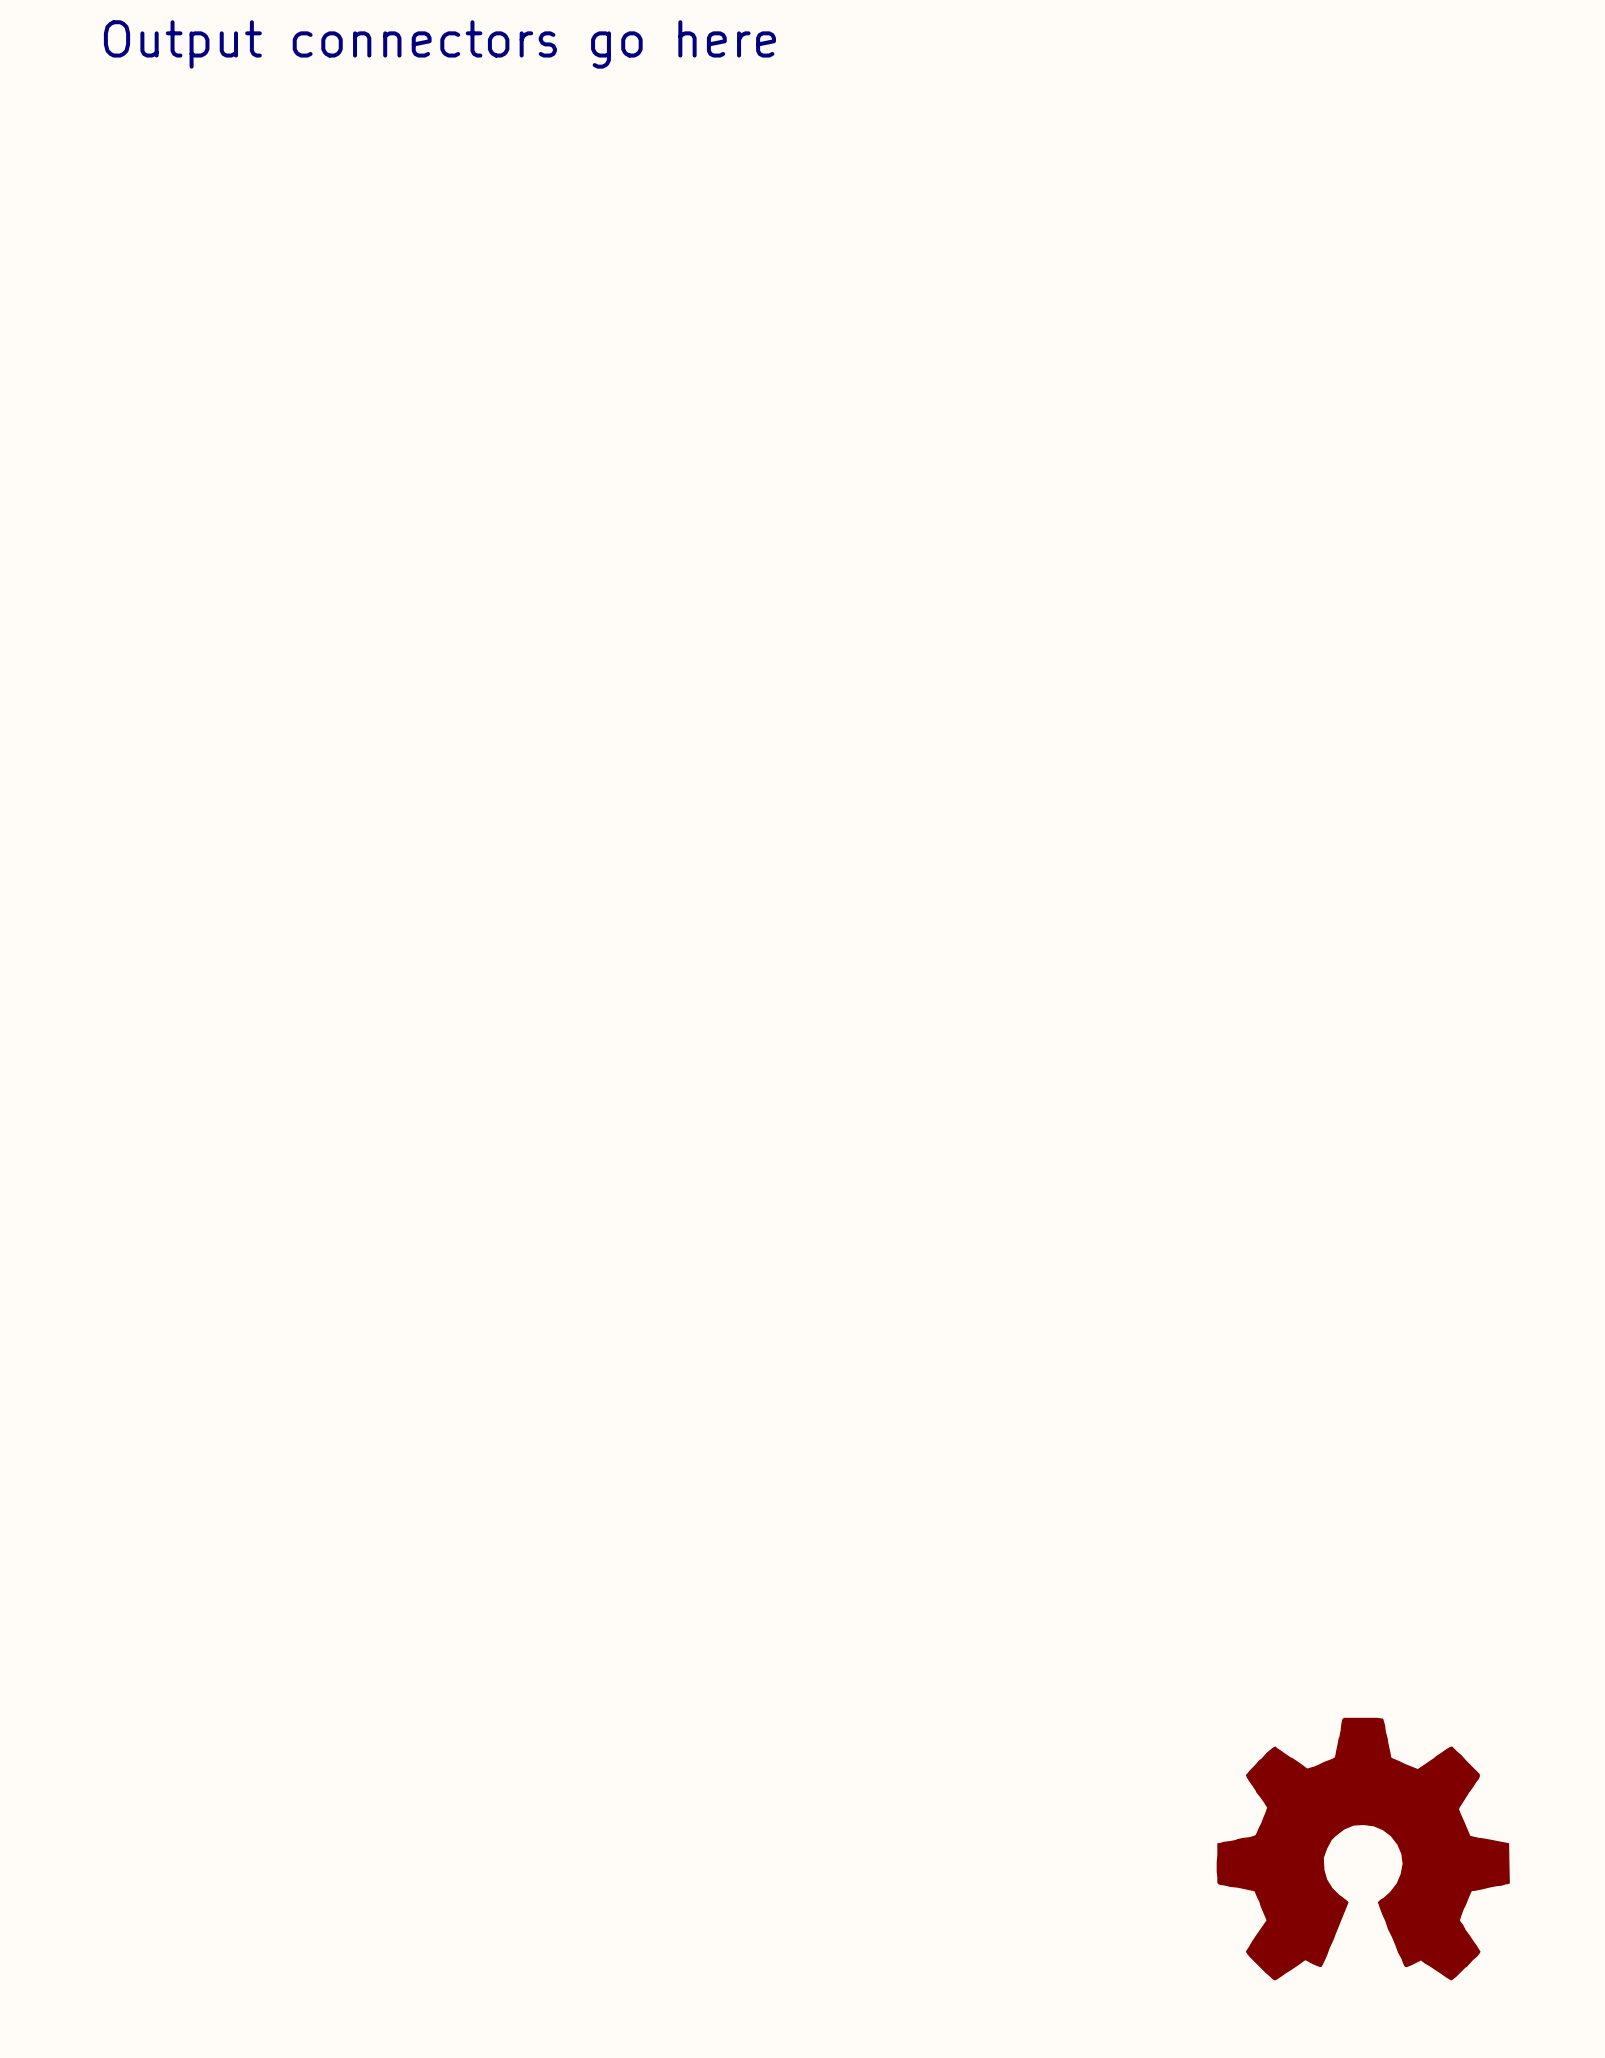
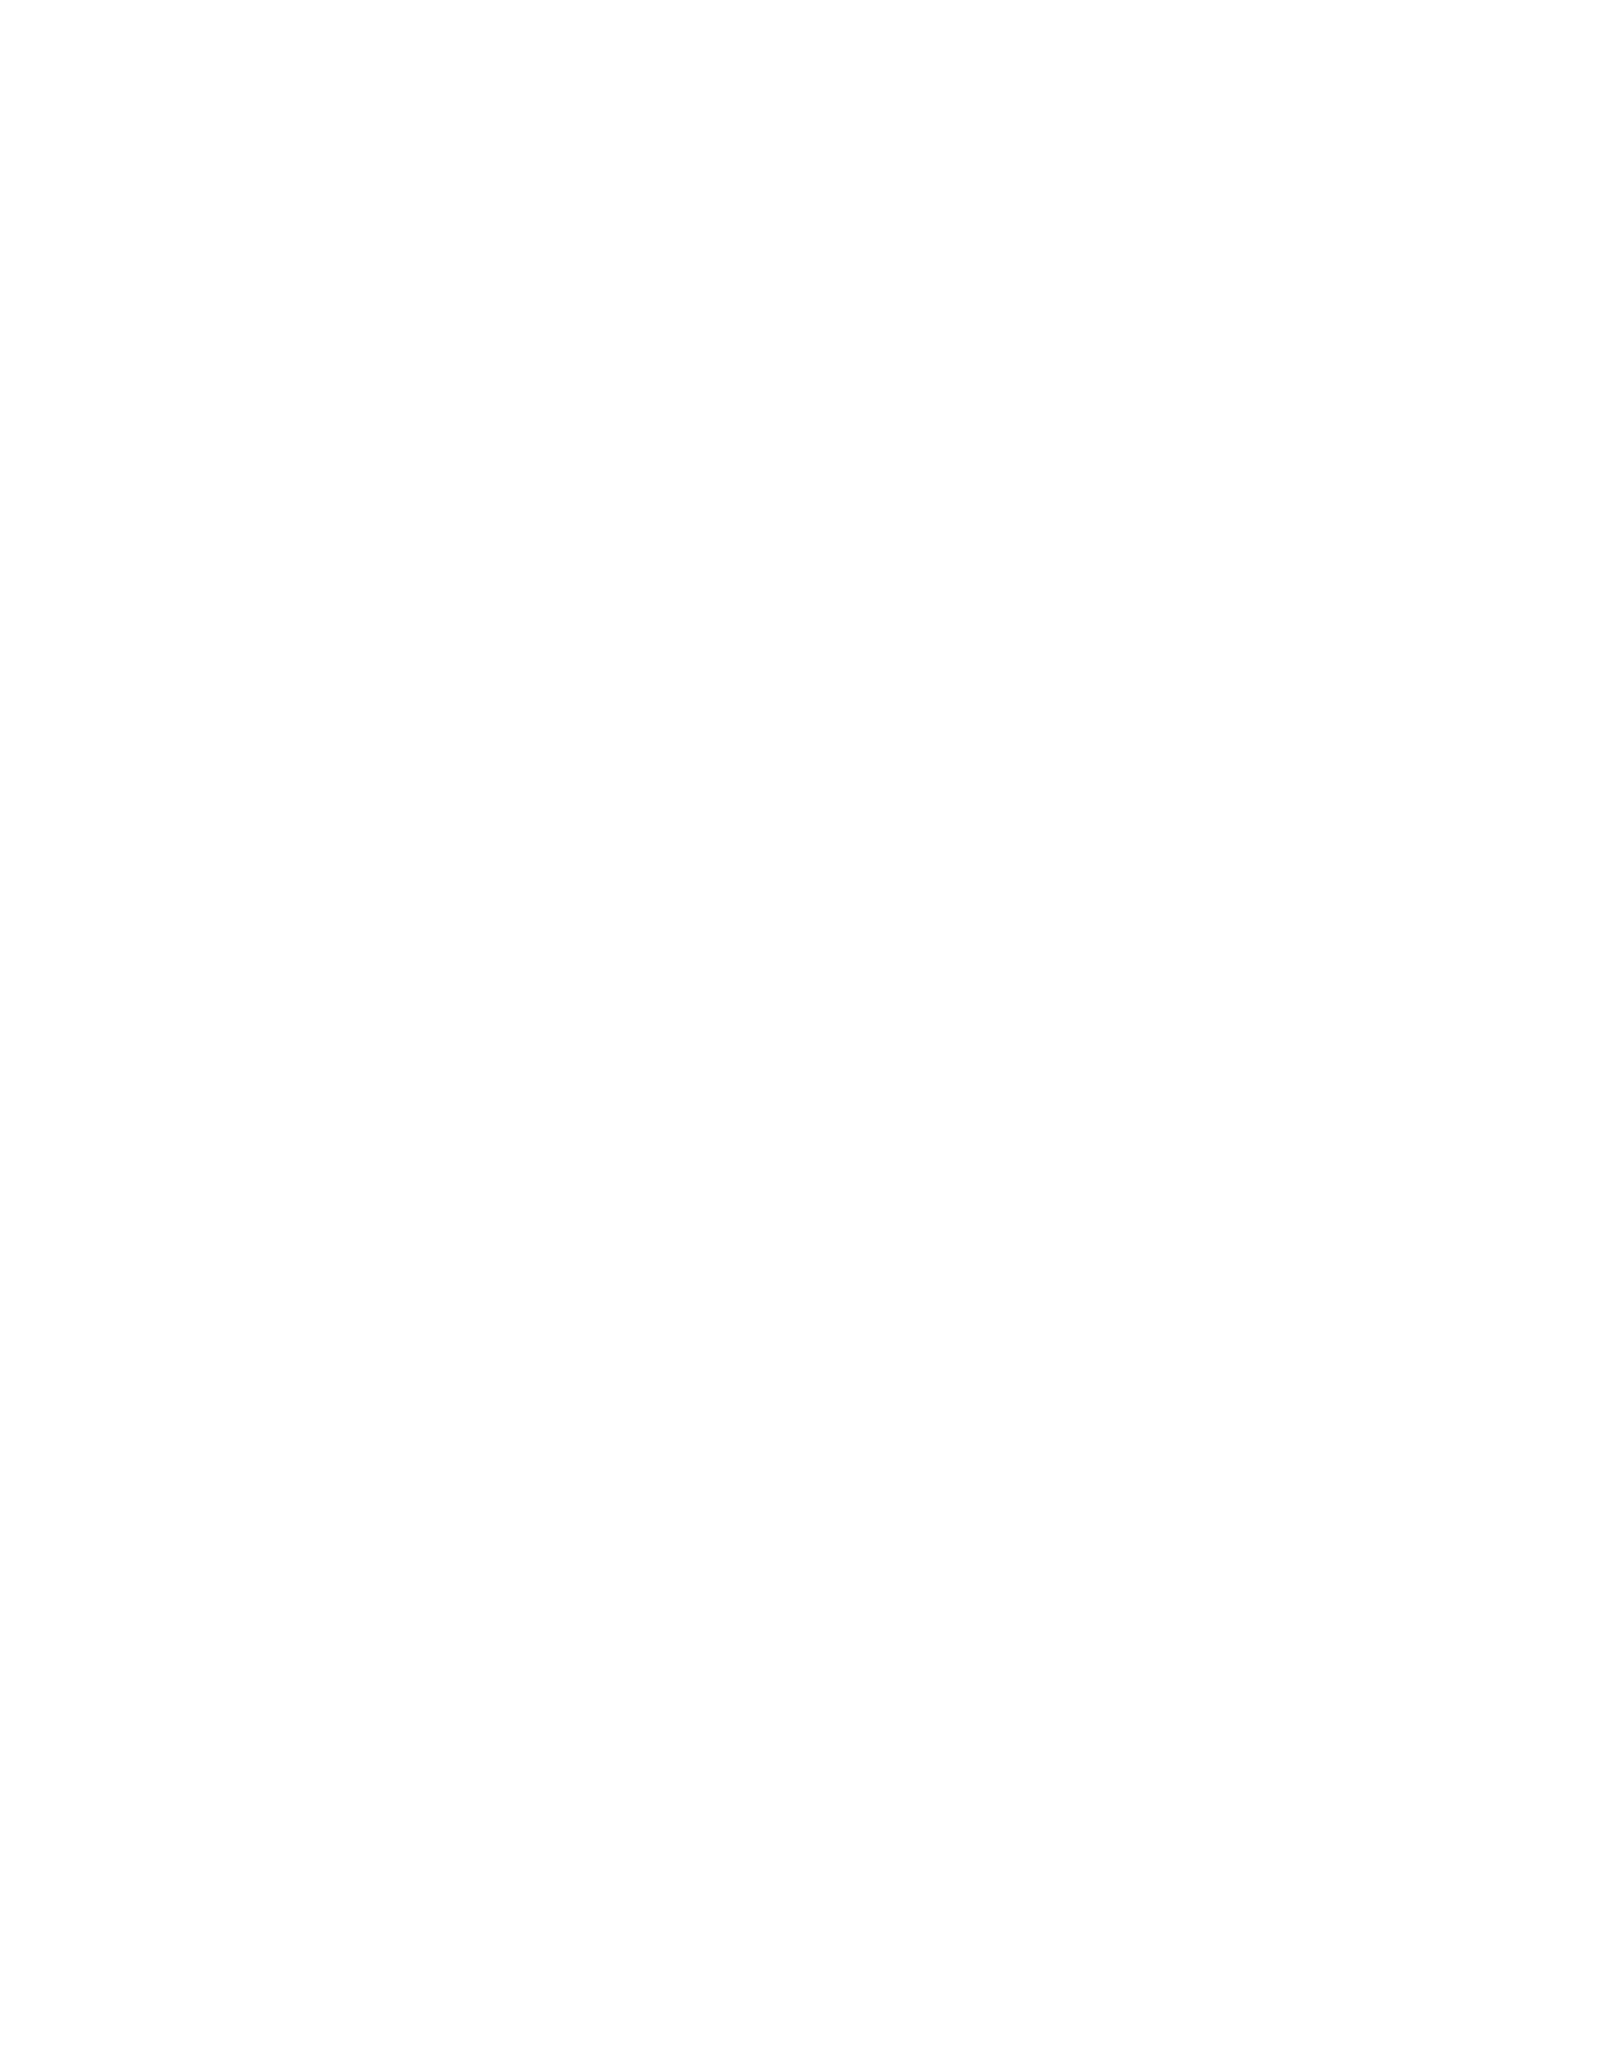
text: Output connectors go here (439, 44) -> none
part: (1363, 1849) -> none

